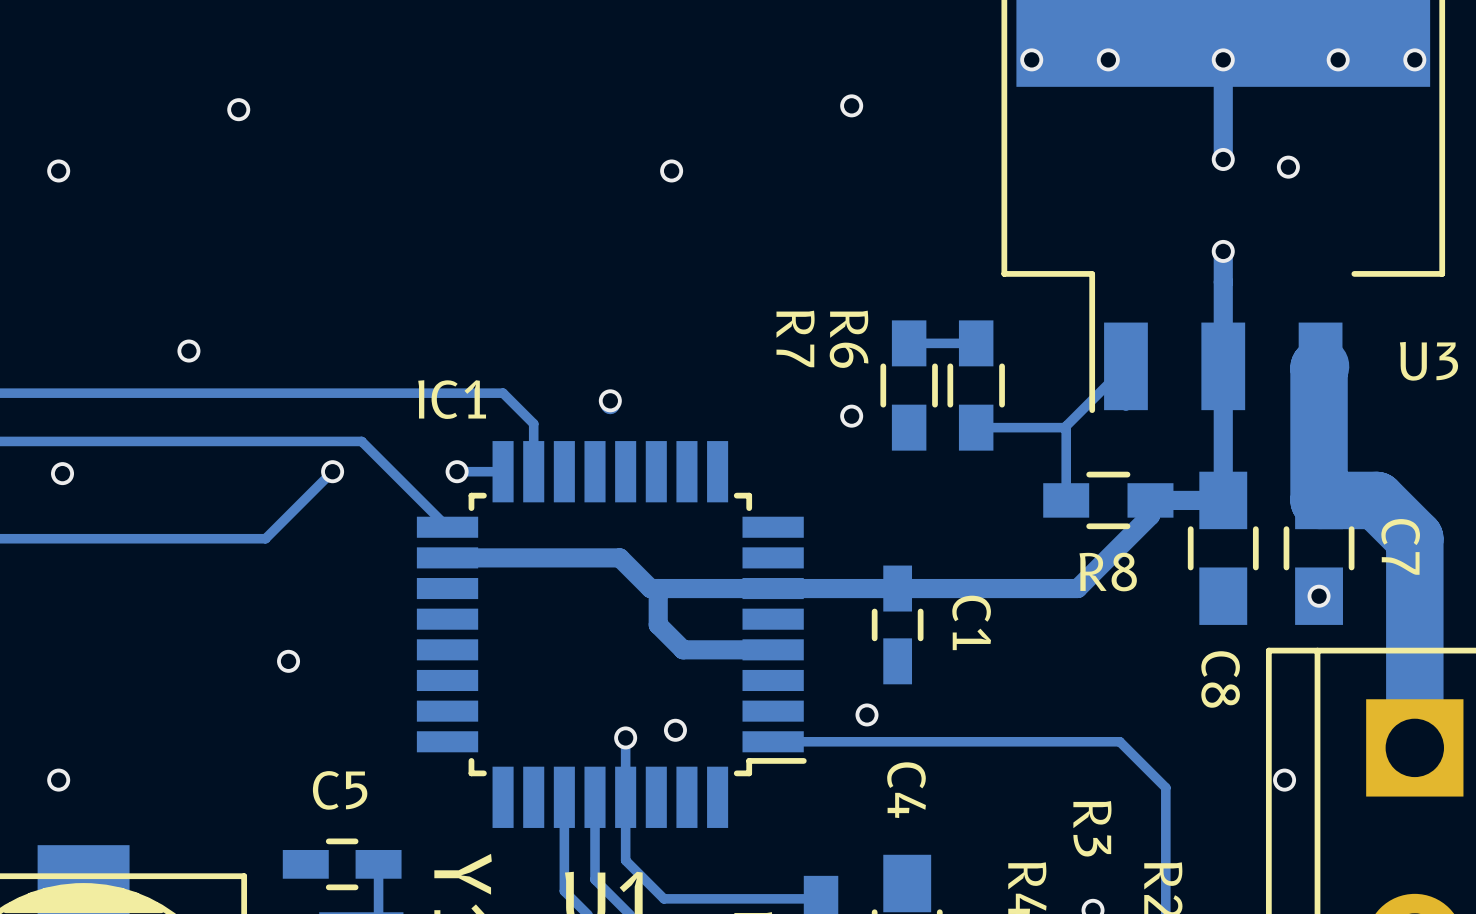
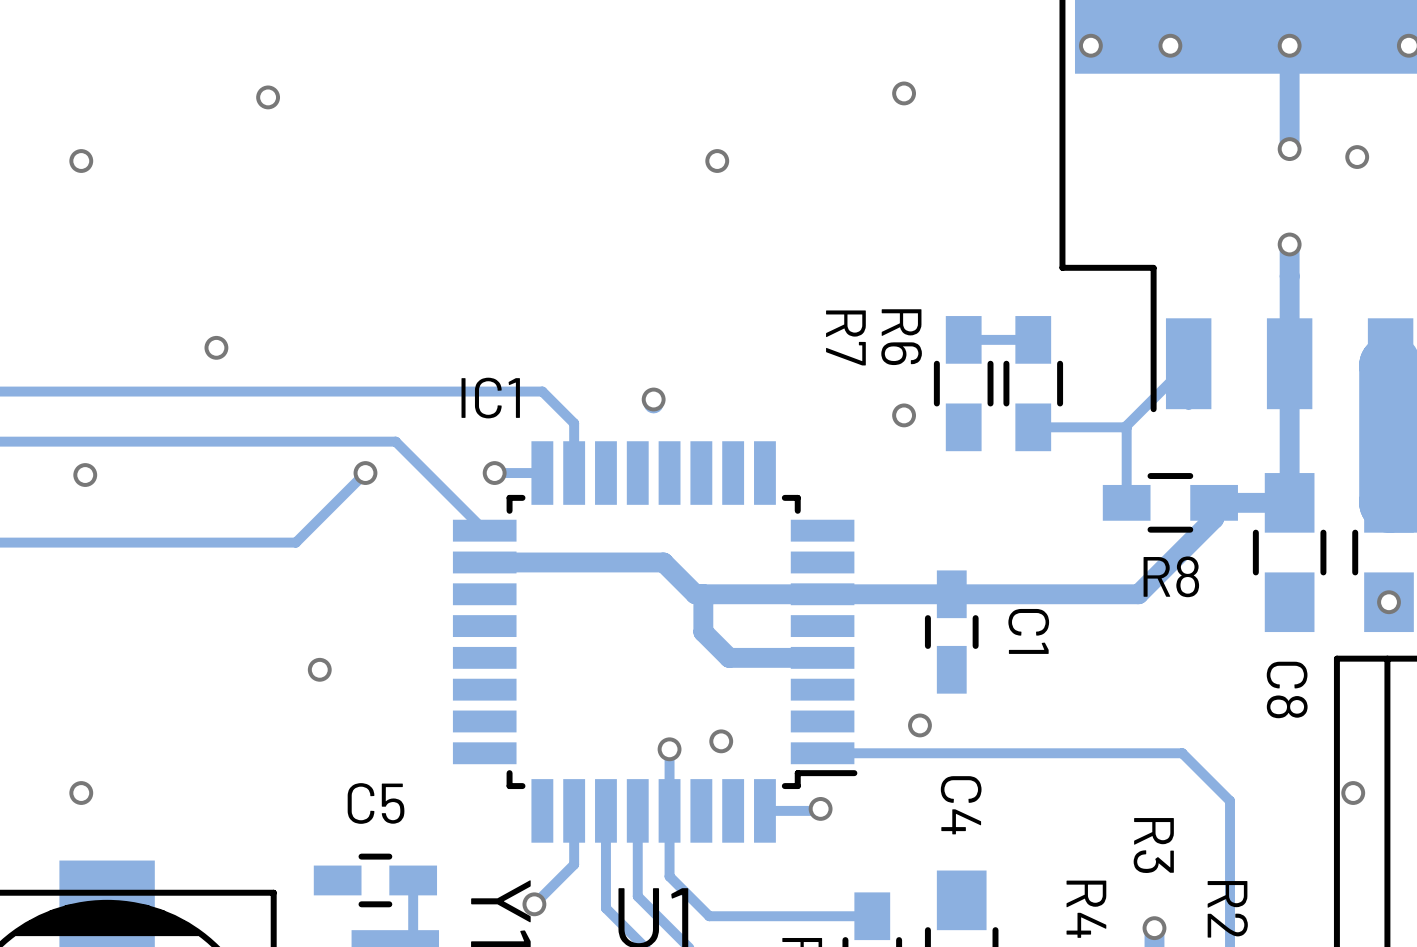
track: none -> (820, 808) (818, 810) (764, 810)
via: none -> (820, 808)
track: none -> (574, 810) (574, 864) (534, 904)
via: none -> (534, 904)

